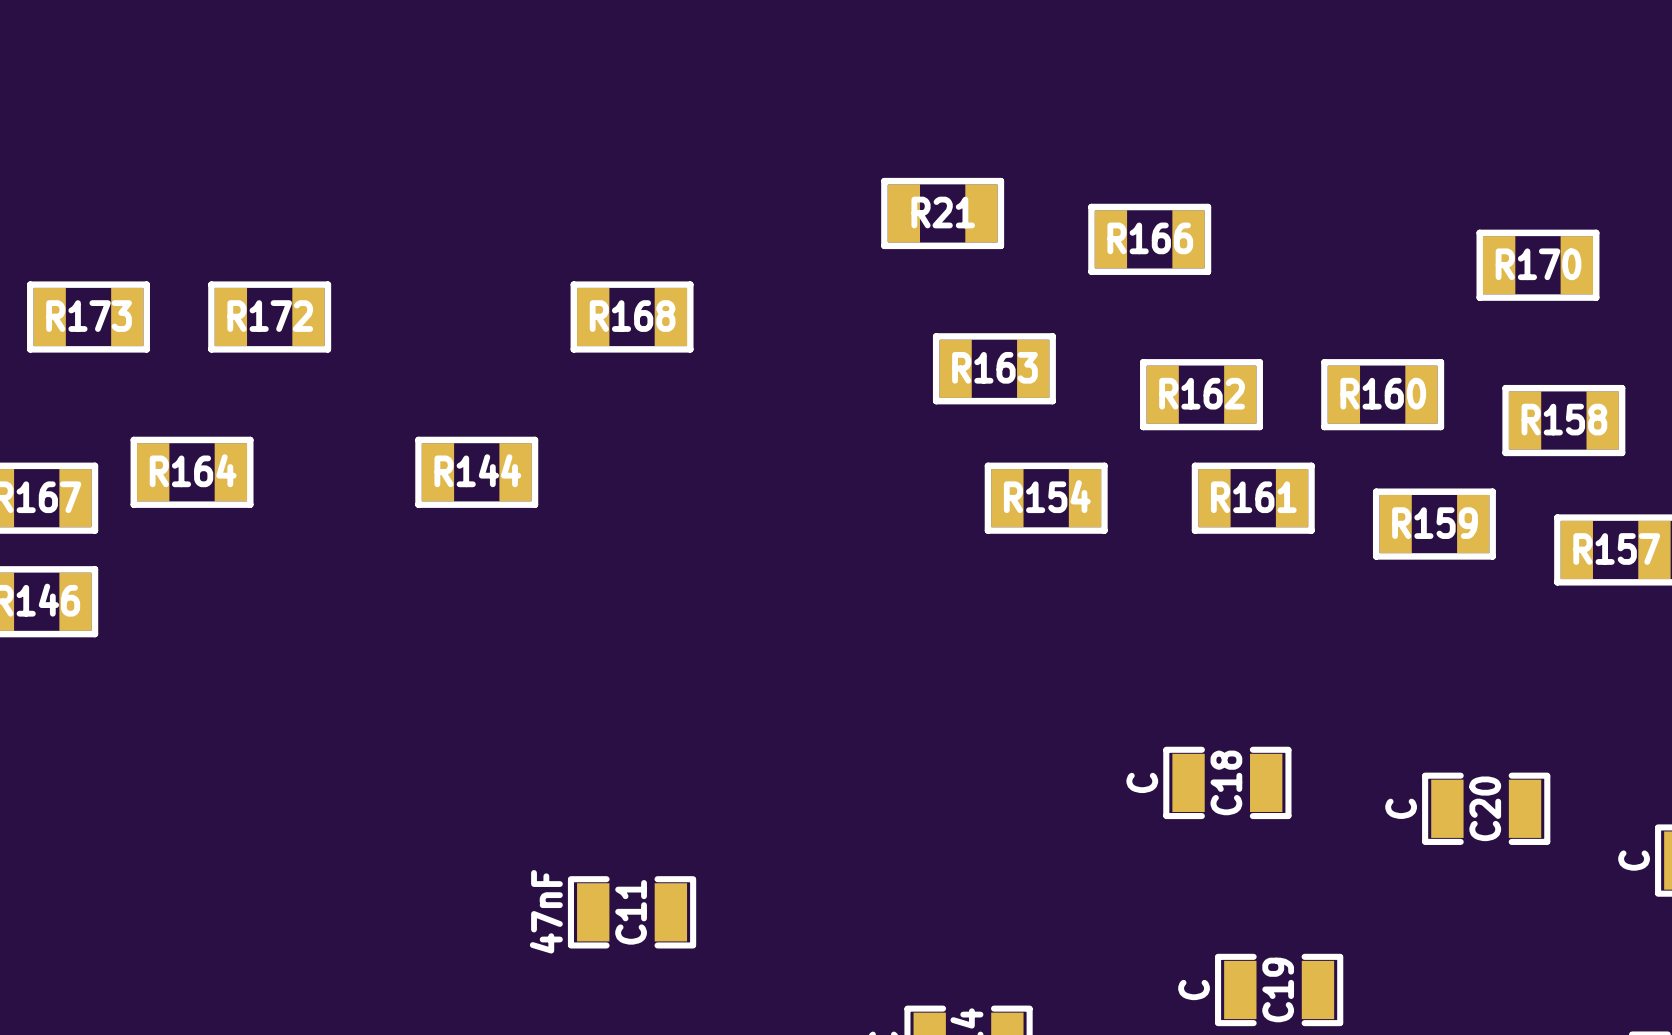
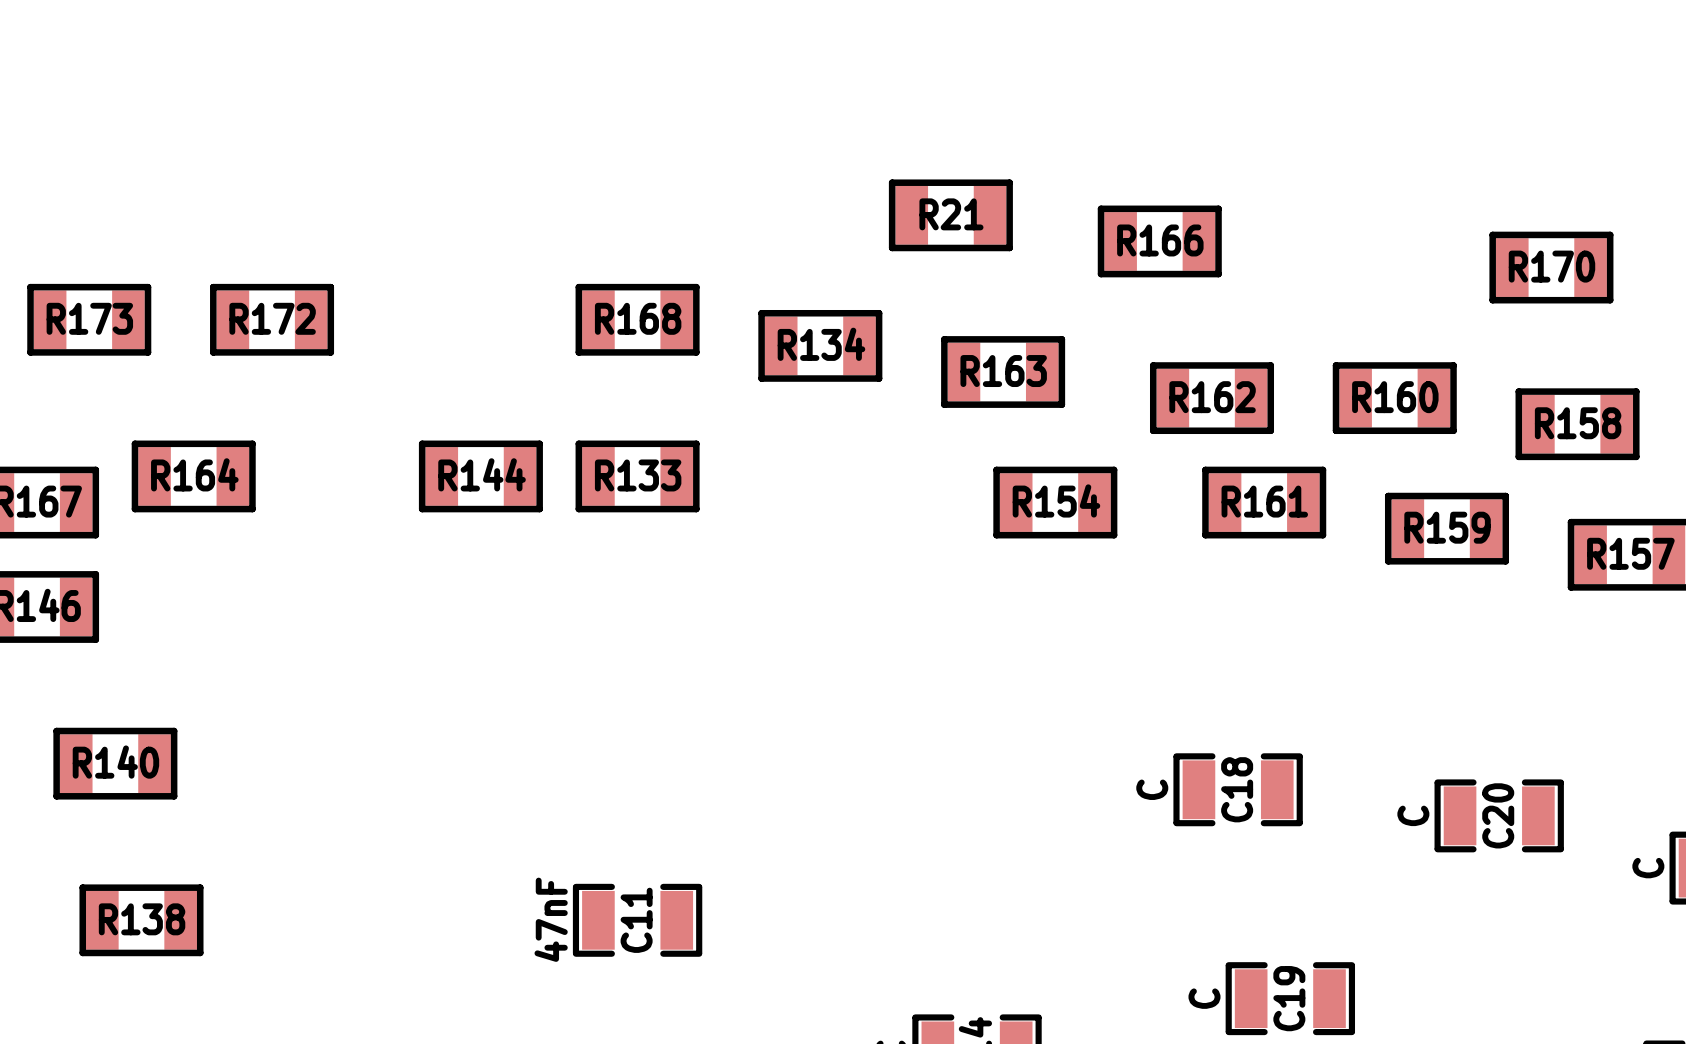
R134: none -> (820, 345)
R133: none -> (637, 476)
R140: none -> (115, 763)
R138: none -> (141, 920)

